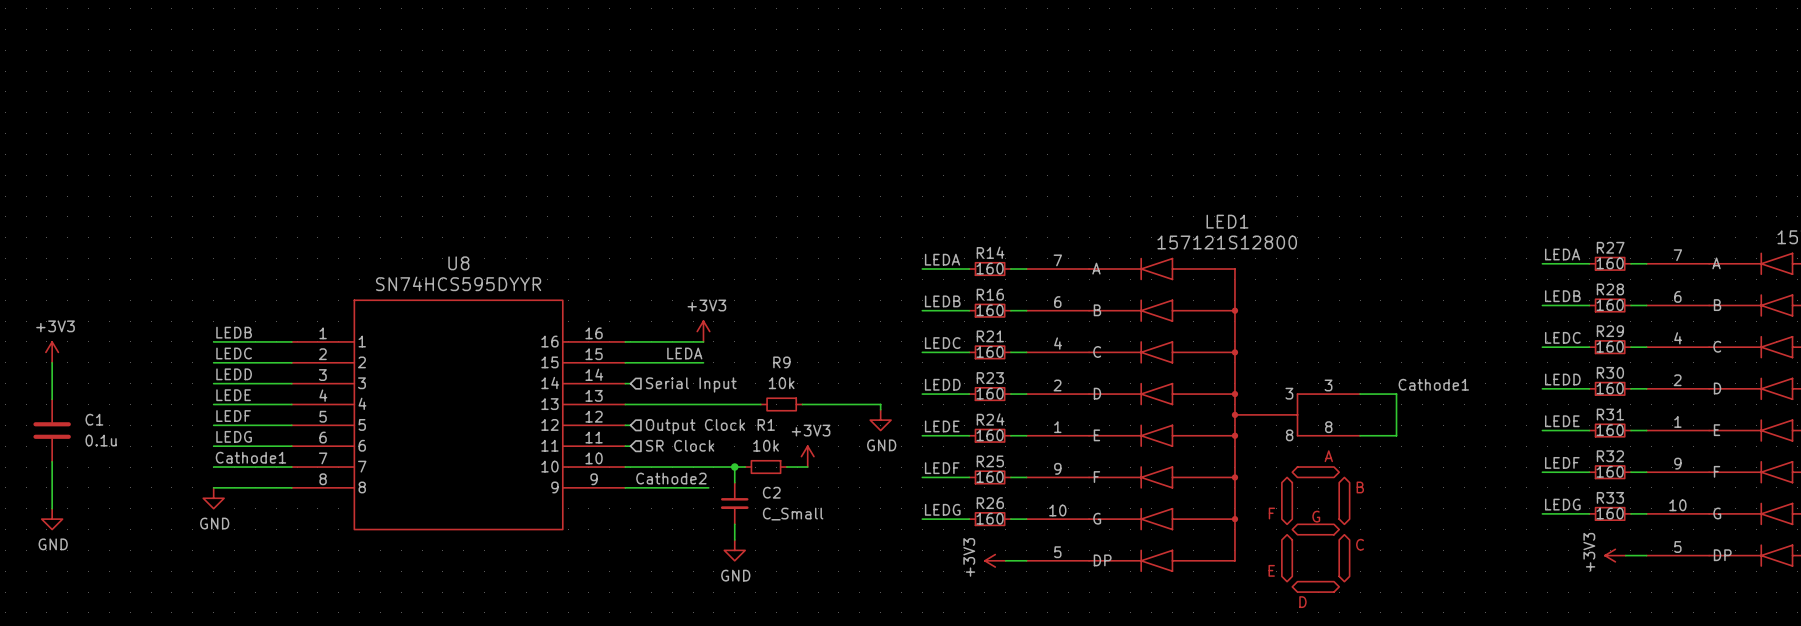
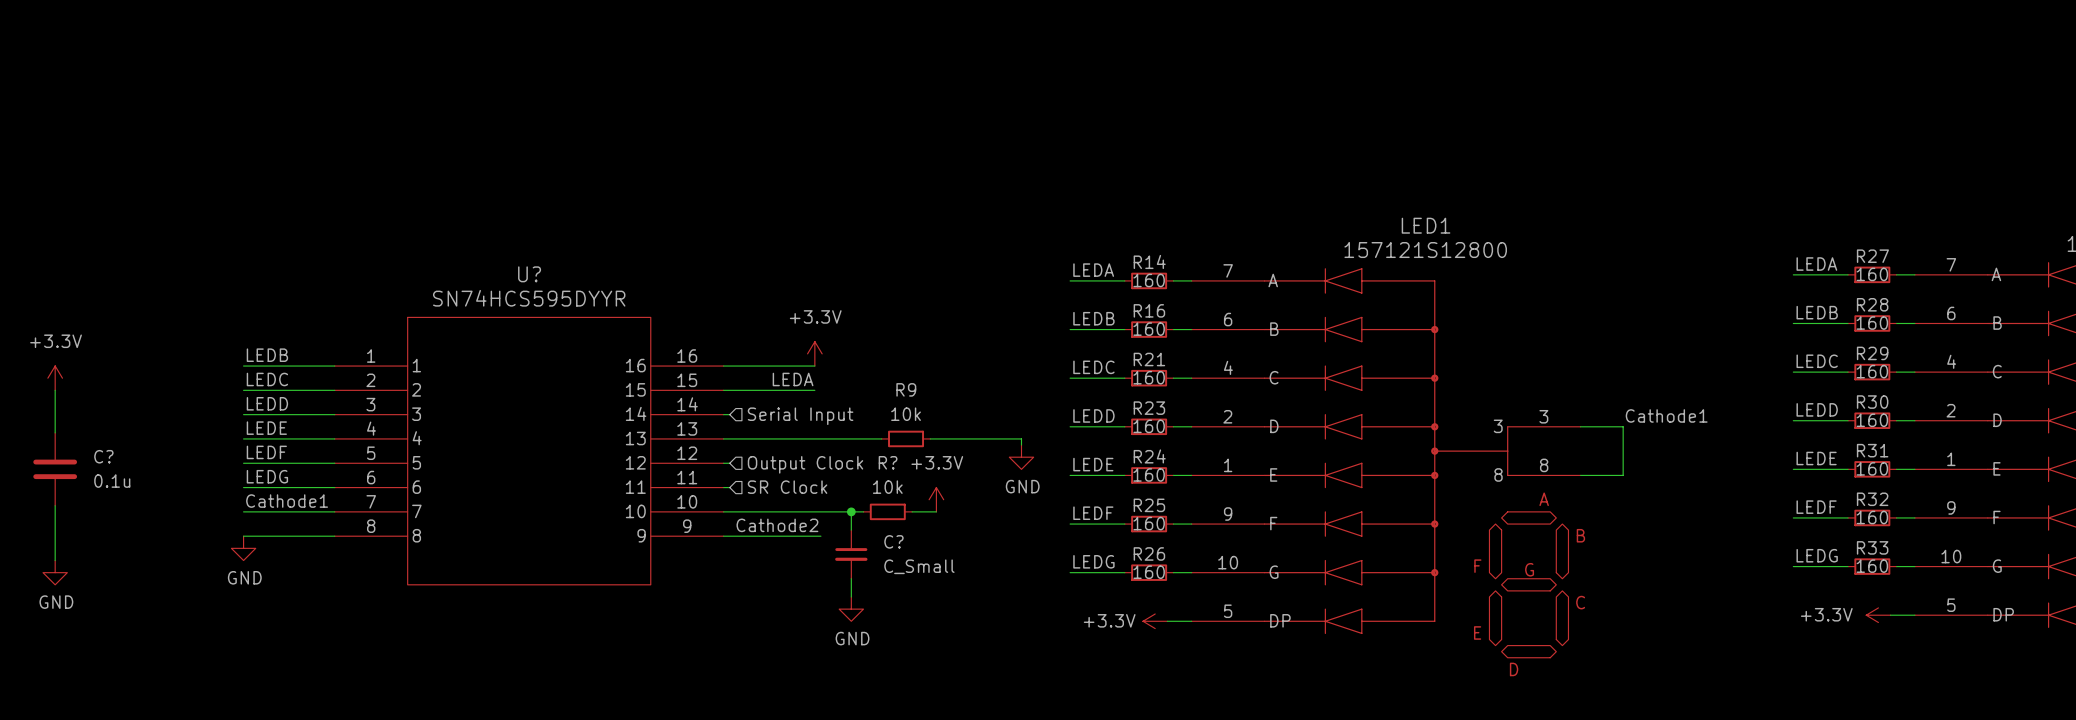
U8 name: U8 (458, 263) -> U? (529, 274)
power symbol: +3V3 (703, 331) -> +3.3V (814, 353)
power symbol: +3V3 (52, 352) -> +3.3V (55, 378)
C1 name: C1 (94, 419) -> C? (103, 456)
R1 name: R1 (766, 424) -> R? (888, 462)
power symbol: +3V3 (807, 456) -> +3.3V (936, 499)
C2 name: C2 (771, 492) -> C? (893, 541)
power symbol: +3V3 (1615, 555) -> +3.3V (1878, 615)
power symbol: +3V3 (995, 560) -> +3.3V (1155, 621)

